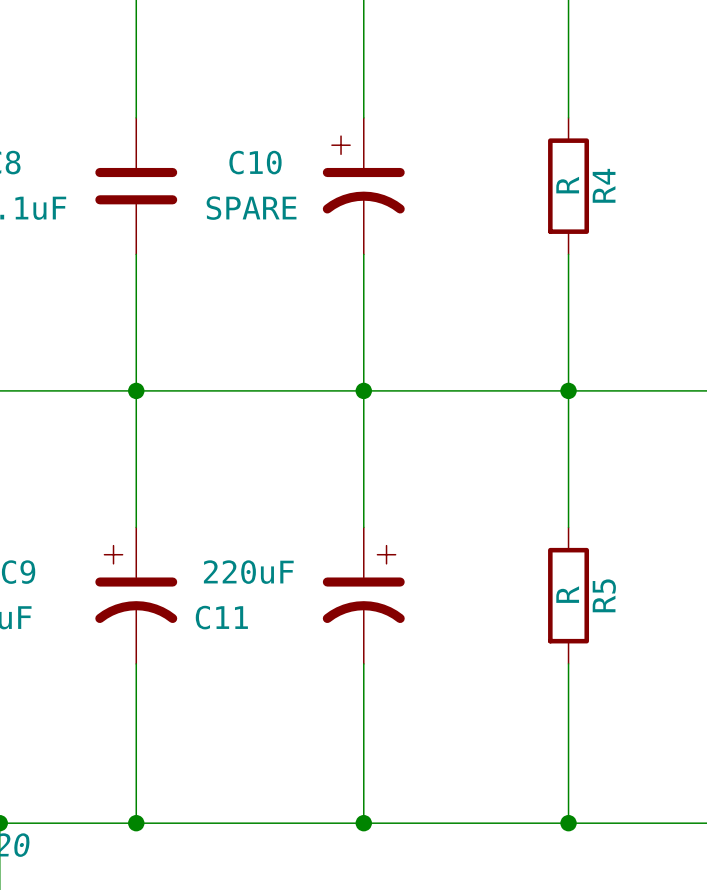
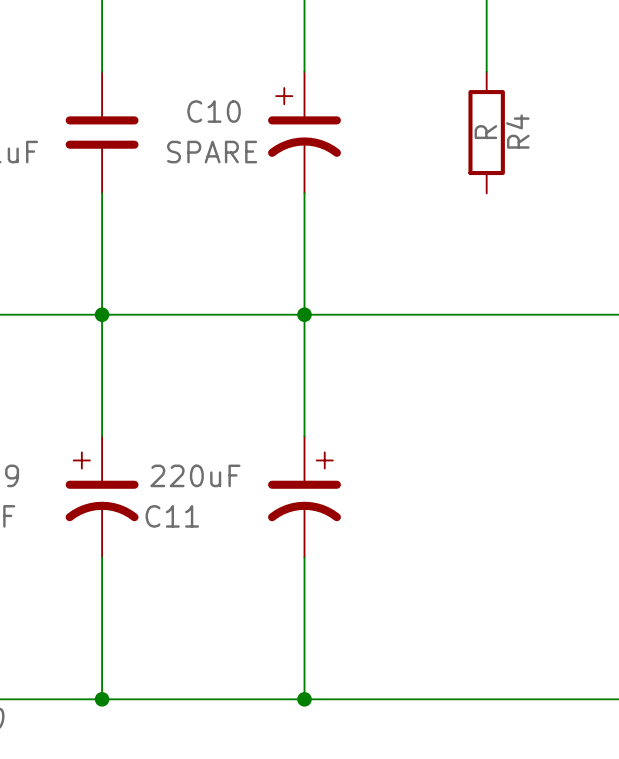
wire: (568, 254) (568, 527) -> none
junction: (568, 390) -> none
R5: R (568, 595) -> none
wire: (568, 663) (568, 823) -> none
junction: (568, 823) -> none

